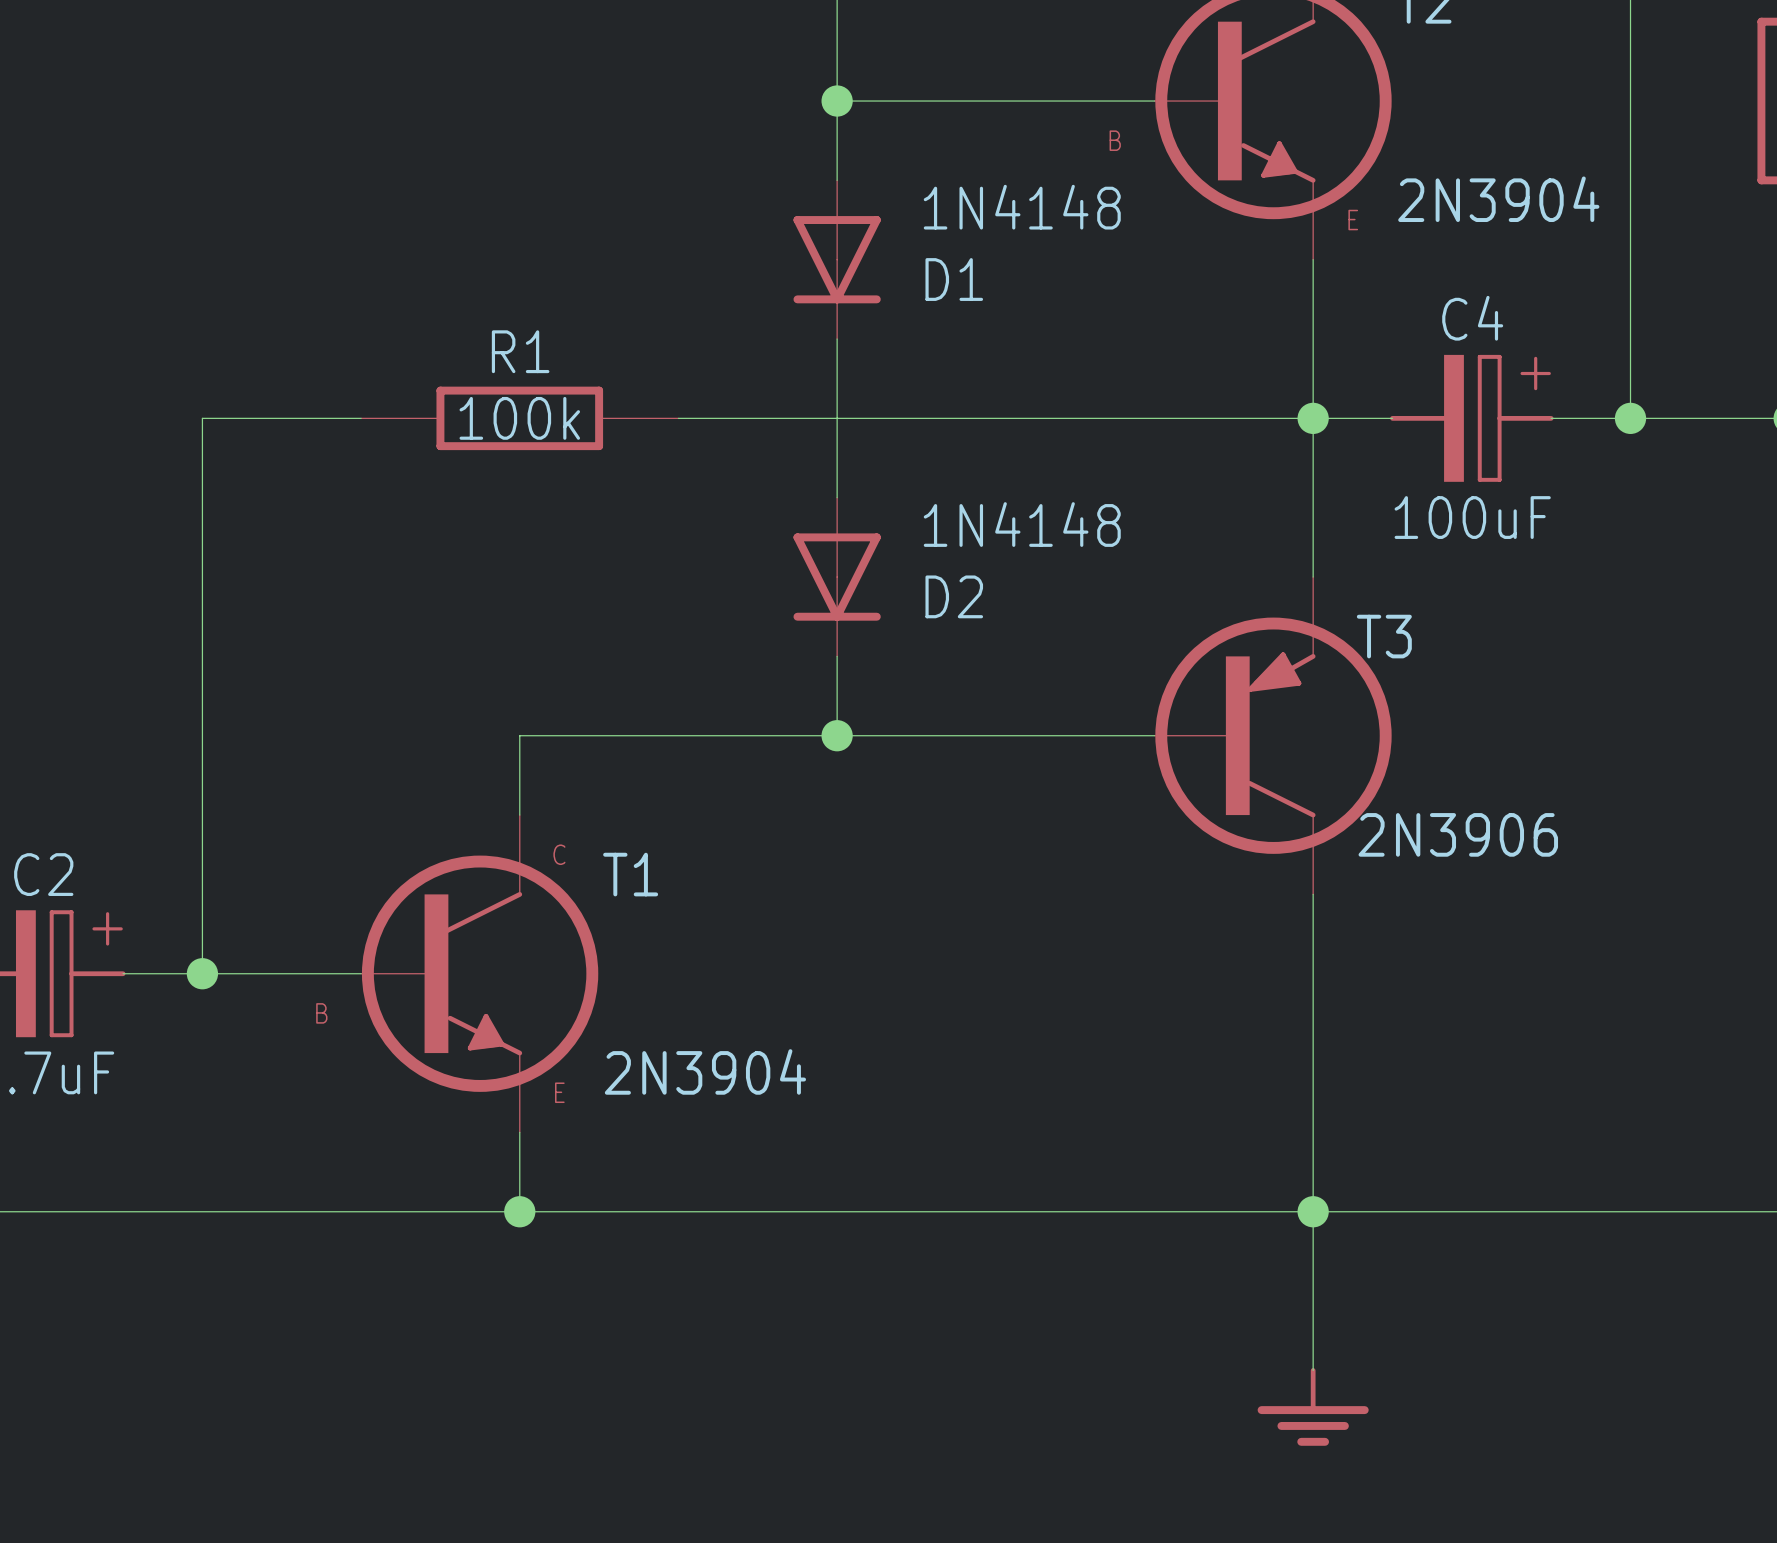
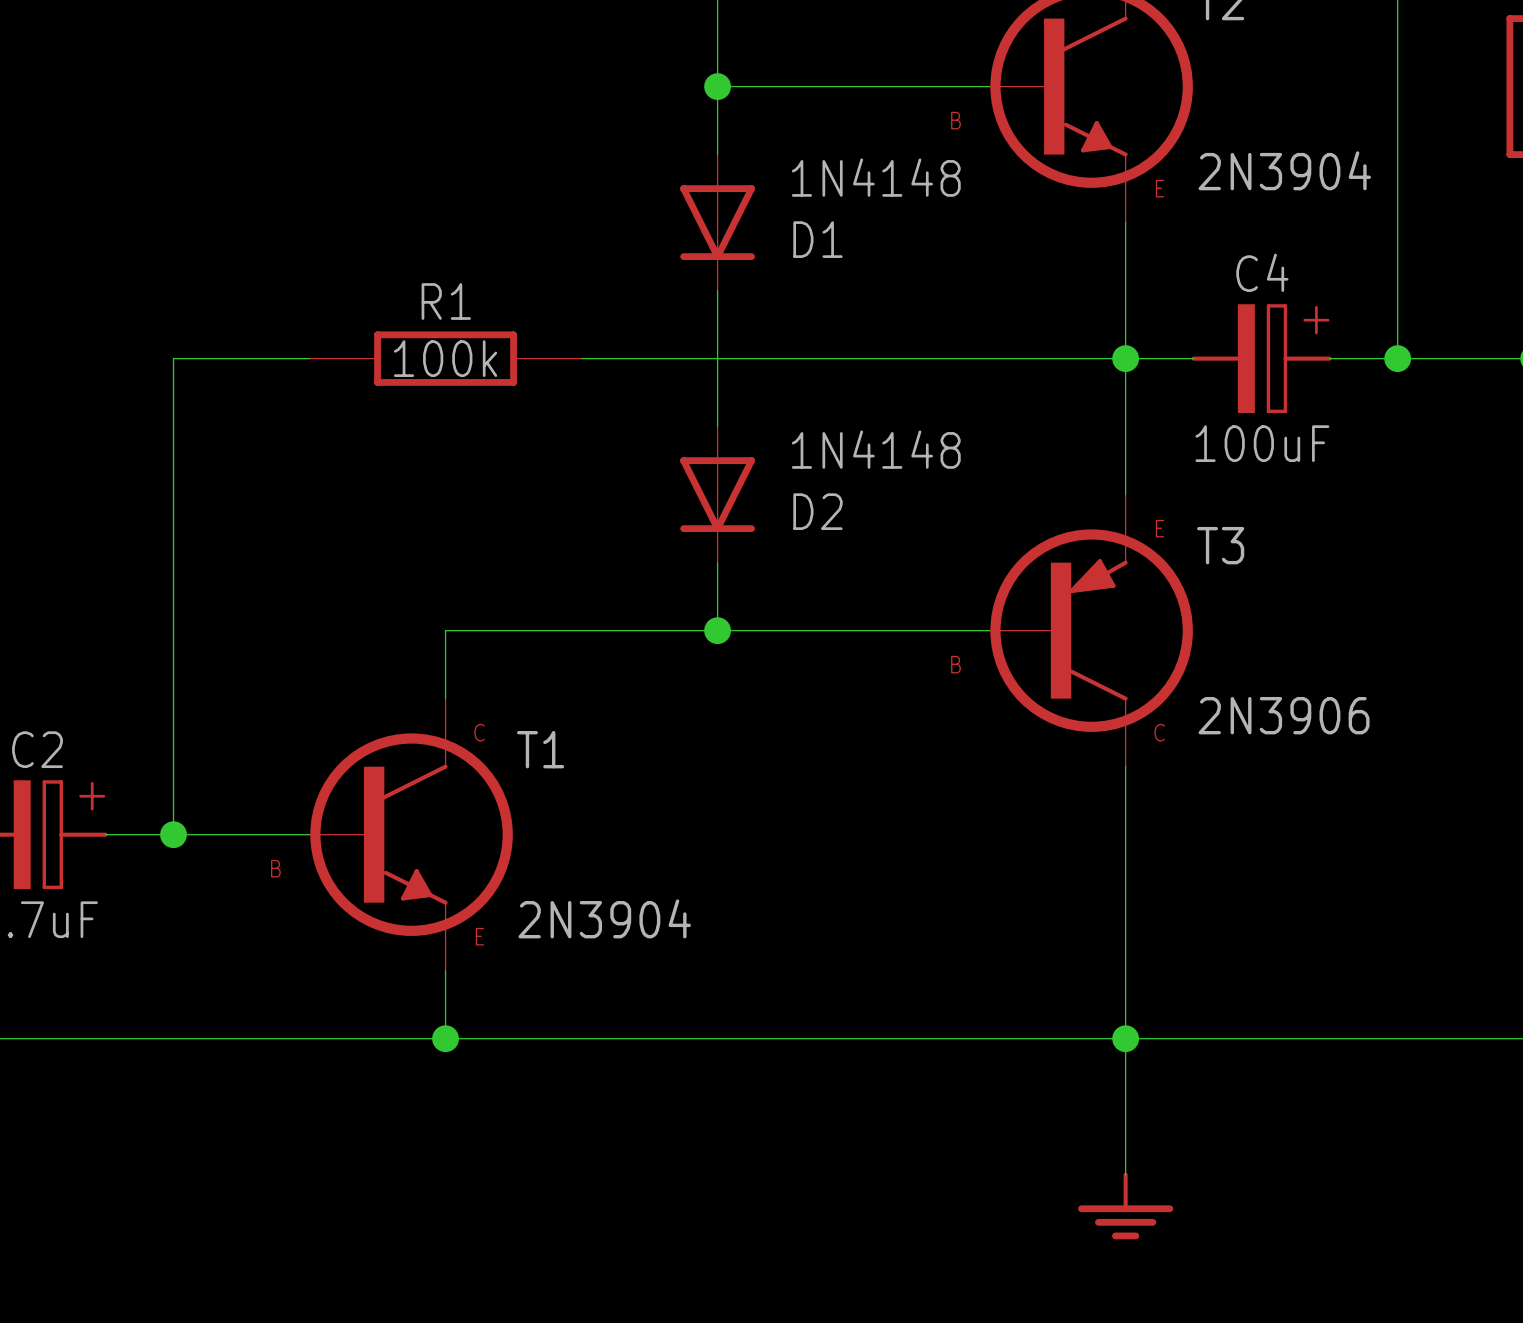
T3 text: none -> E (1159, 528)
T3 name position: T3 (1384, 636) -> T3 (1220, 545)
T3 text: none -> B (955, 664)
T3 value position: 2N3906 (1458, 834) -> 2N3906 (1284, 715)
T3 text: none -> C (1159, 732)

